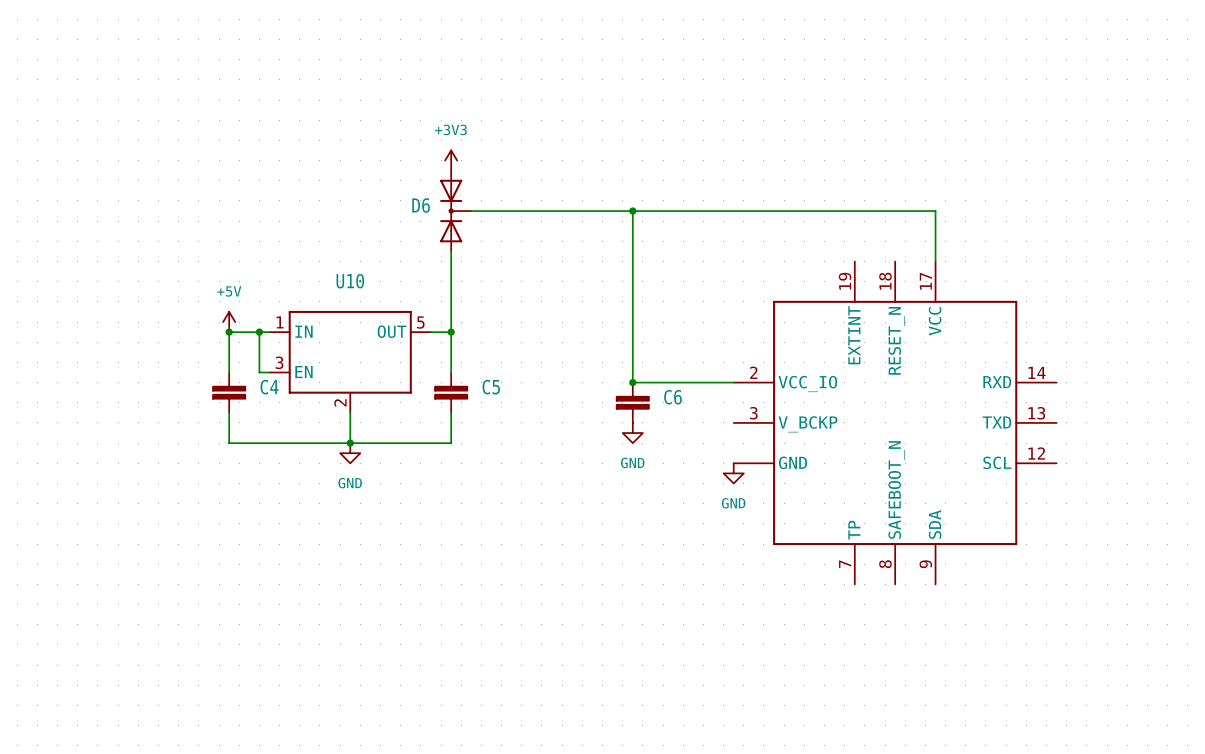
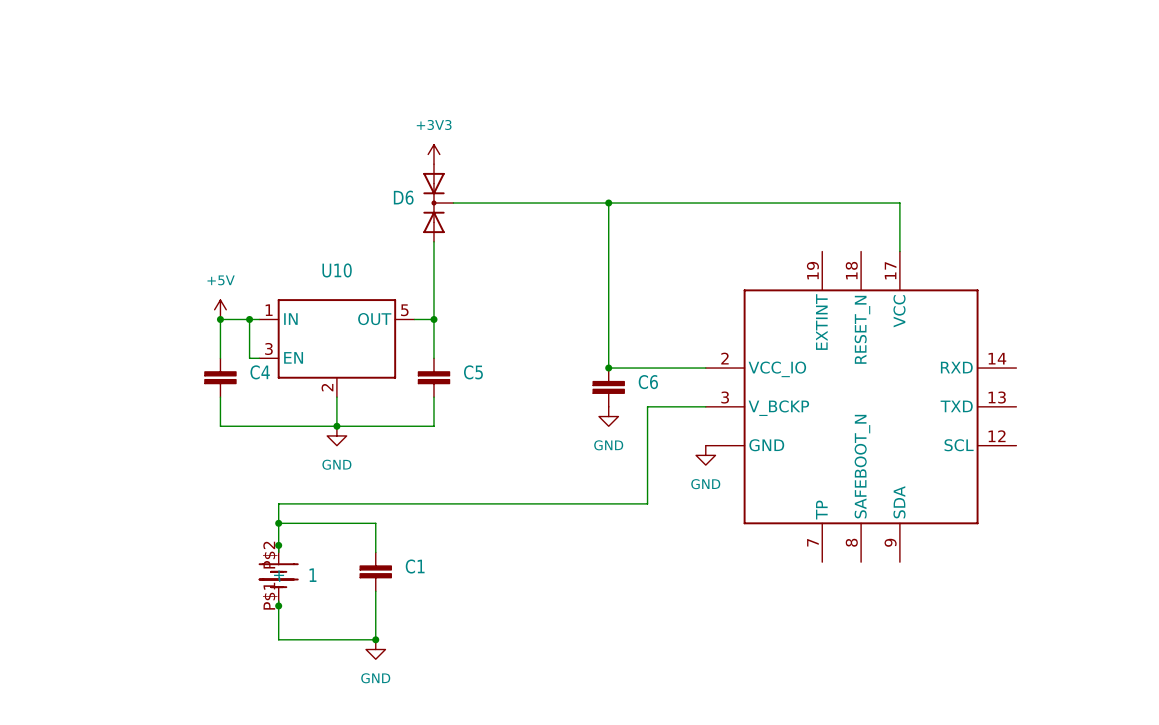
wire: none -> (705, 406) (647, 406) (647, 503) (278, 503) (278, 552)
wire: none -> (278, 523) (375, 523) (375, 552)
junction: none -> (278, 523)
junction: none -> (278, 545)
C1: none -> (375, 571)
1: none -> (278, 575)
wire: none -> (375, 591) (375, 639) (278, 639) (278, 600)
junction: none -> (278, 605)
junction: none -> (375, 639)
power symbol: none -> GND (375, 649)

